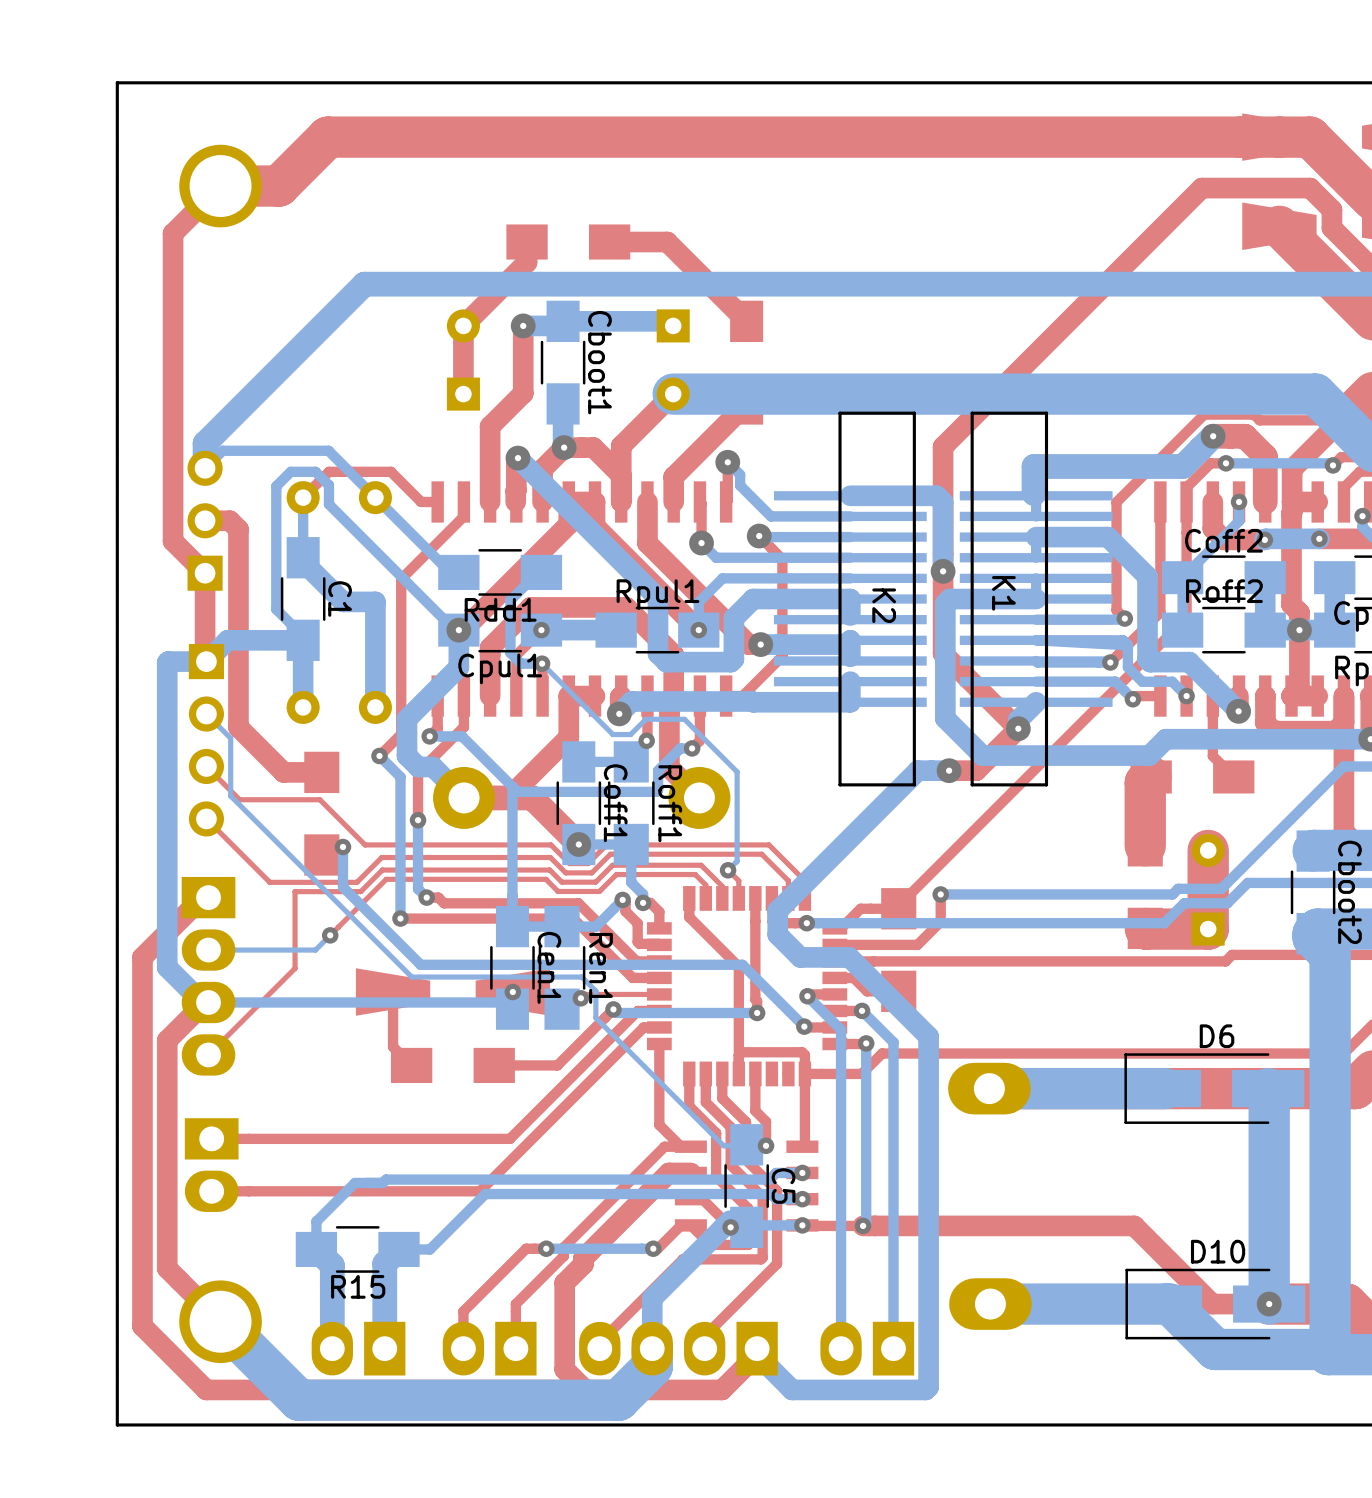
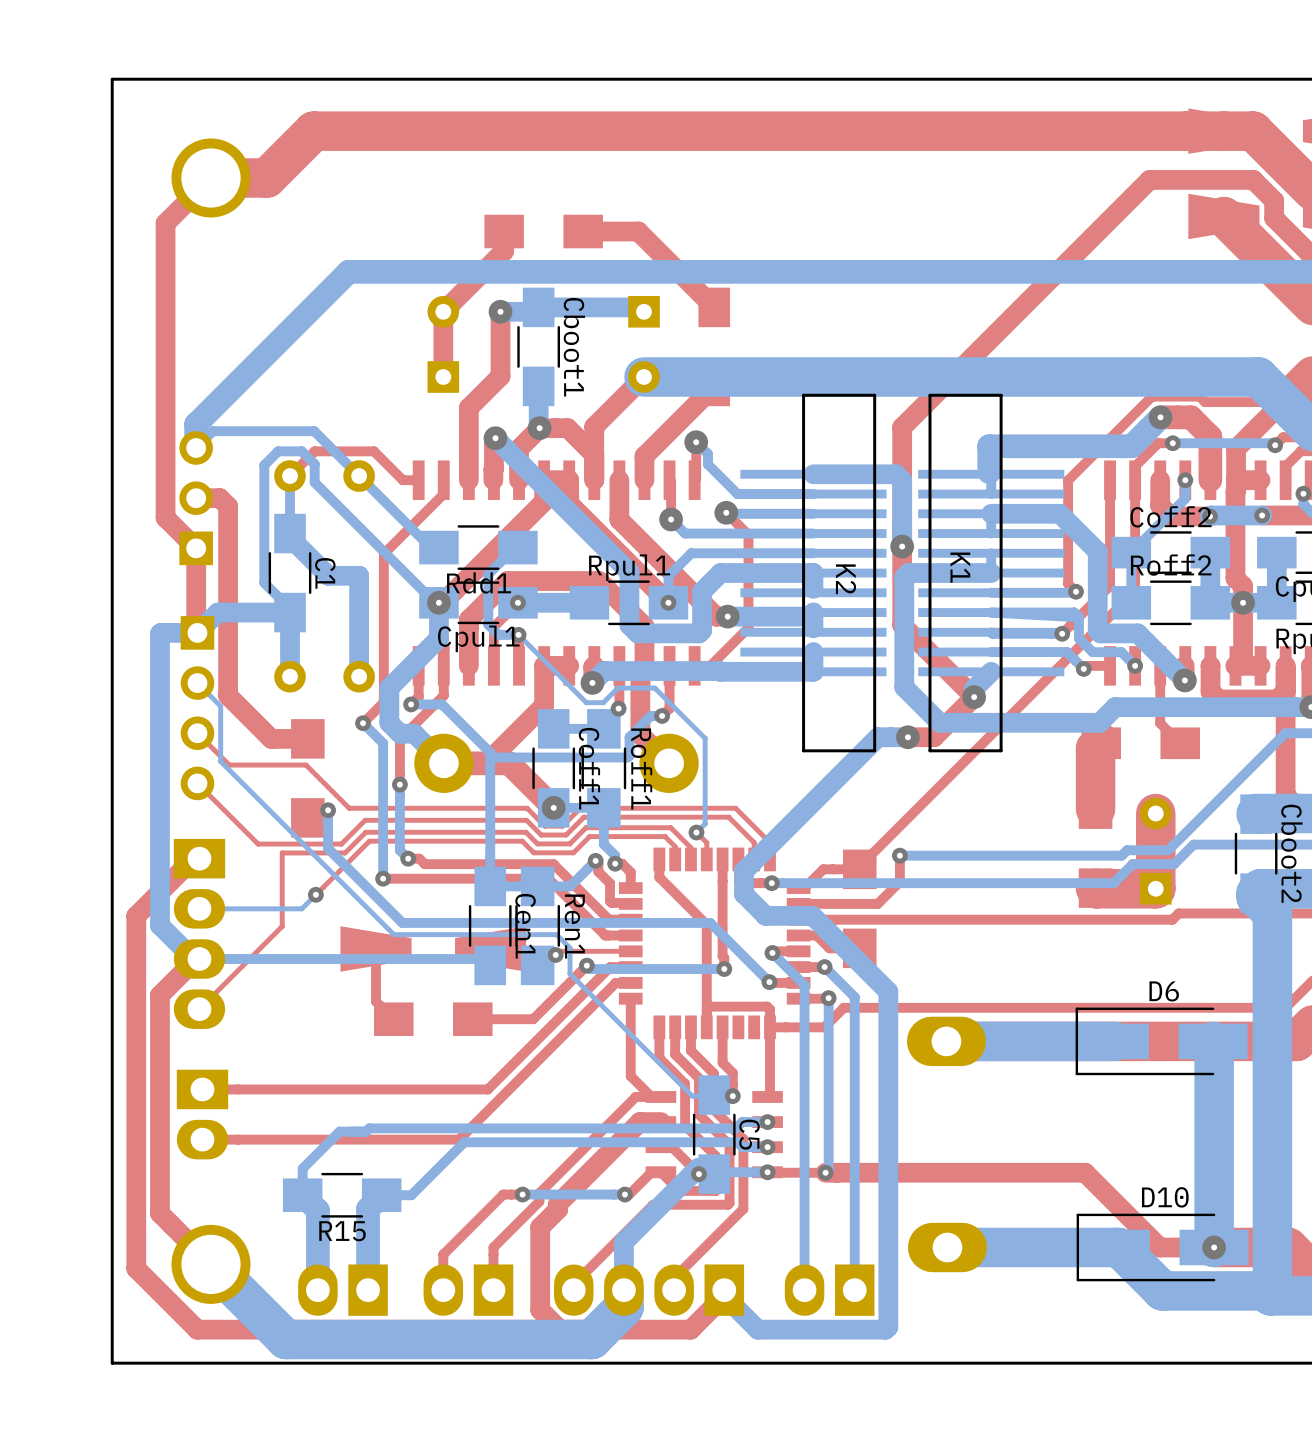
via: (512, 992) -> none

